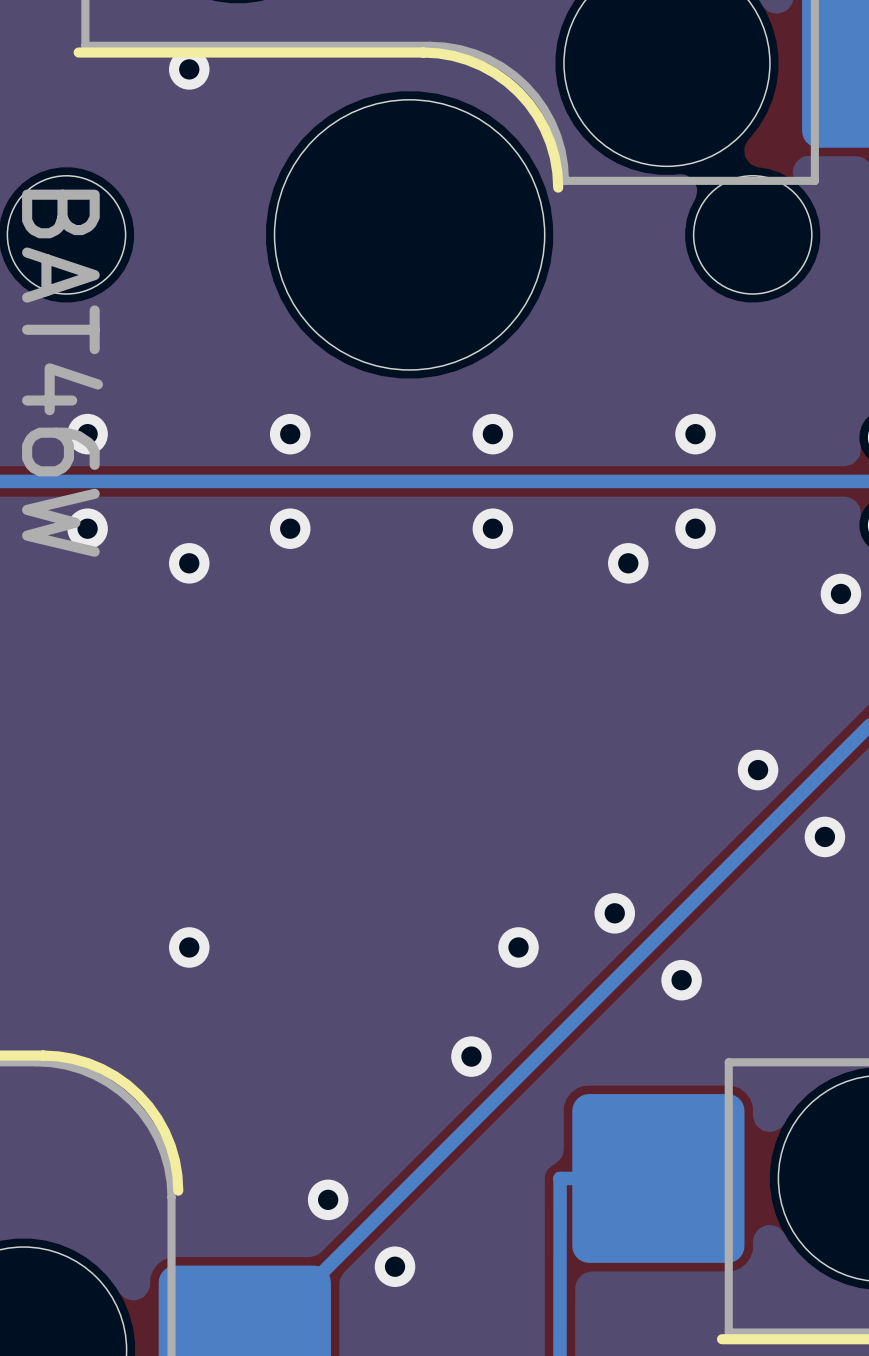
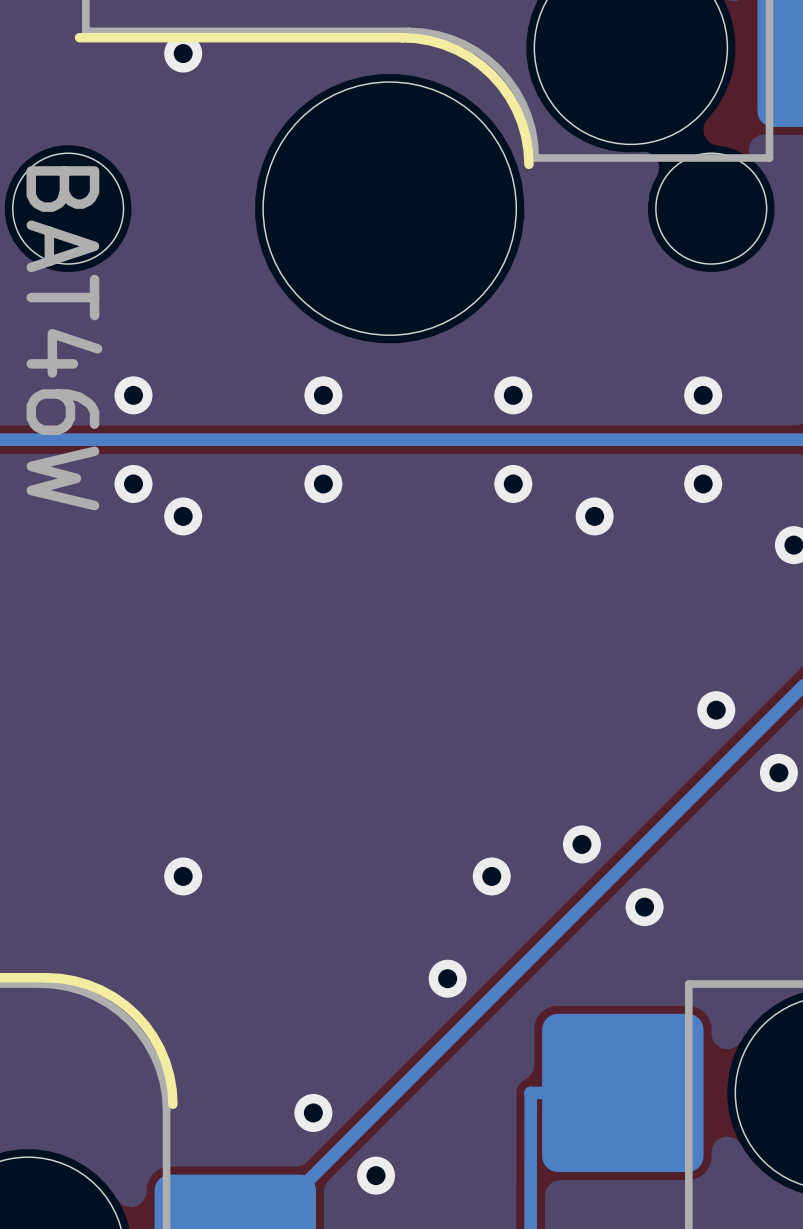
via position: (87, 434) -> (133, 395)
via position: (290, 434) -> (323, 395)
via position: (492, 434) -> (513, 395)
via position: (695, 434) -> (703, 395)
via position: (87, 528) -> (133, 483)
via position: (290, 528) -> (323, 483)
via position: (492, 528) -> (513, 483)
via position: (695, 528) -> (703, 483)

